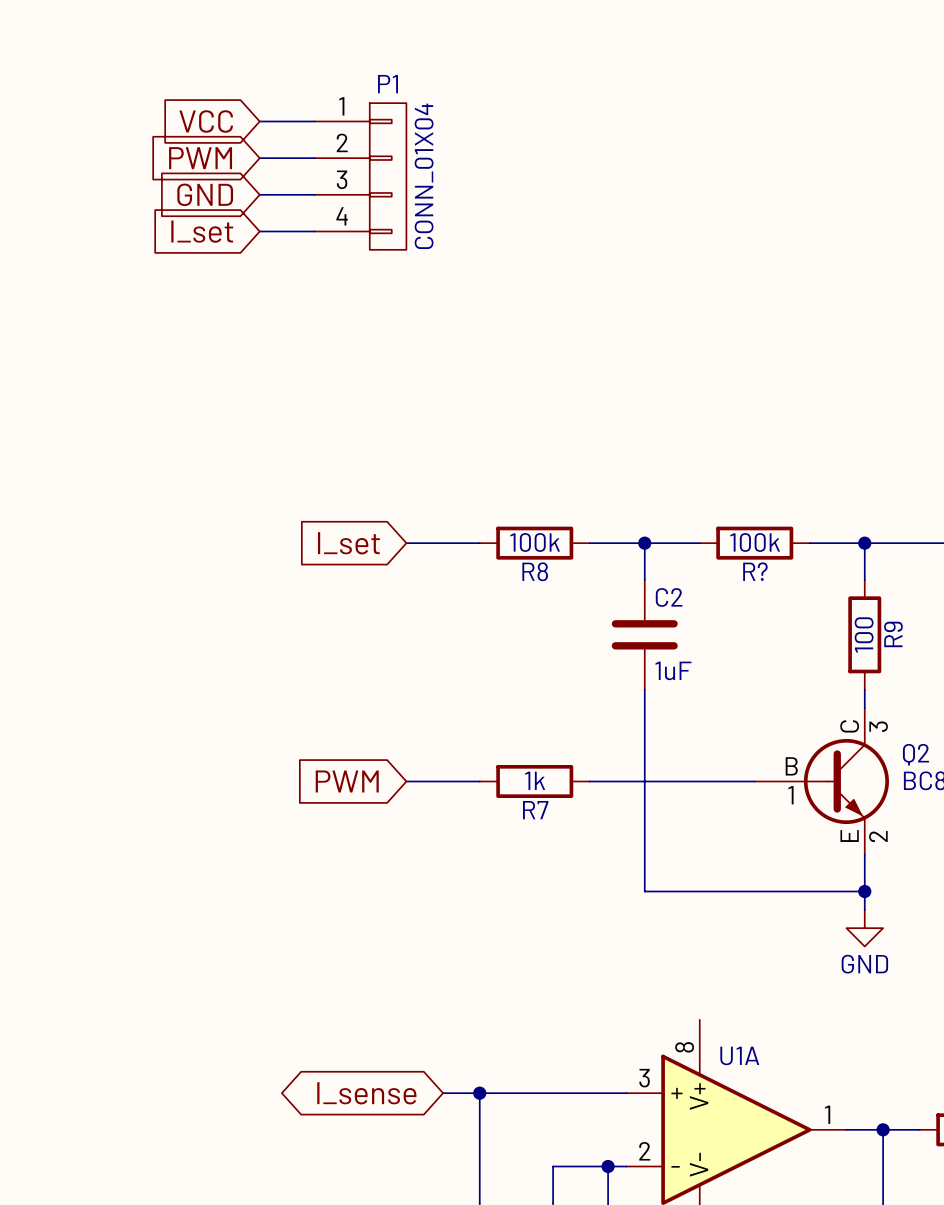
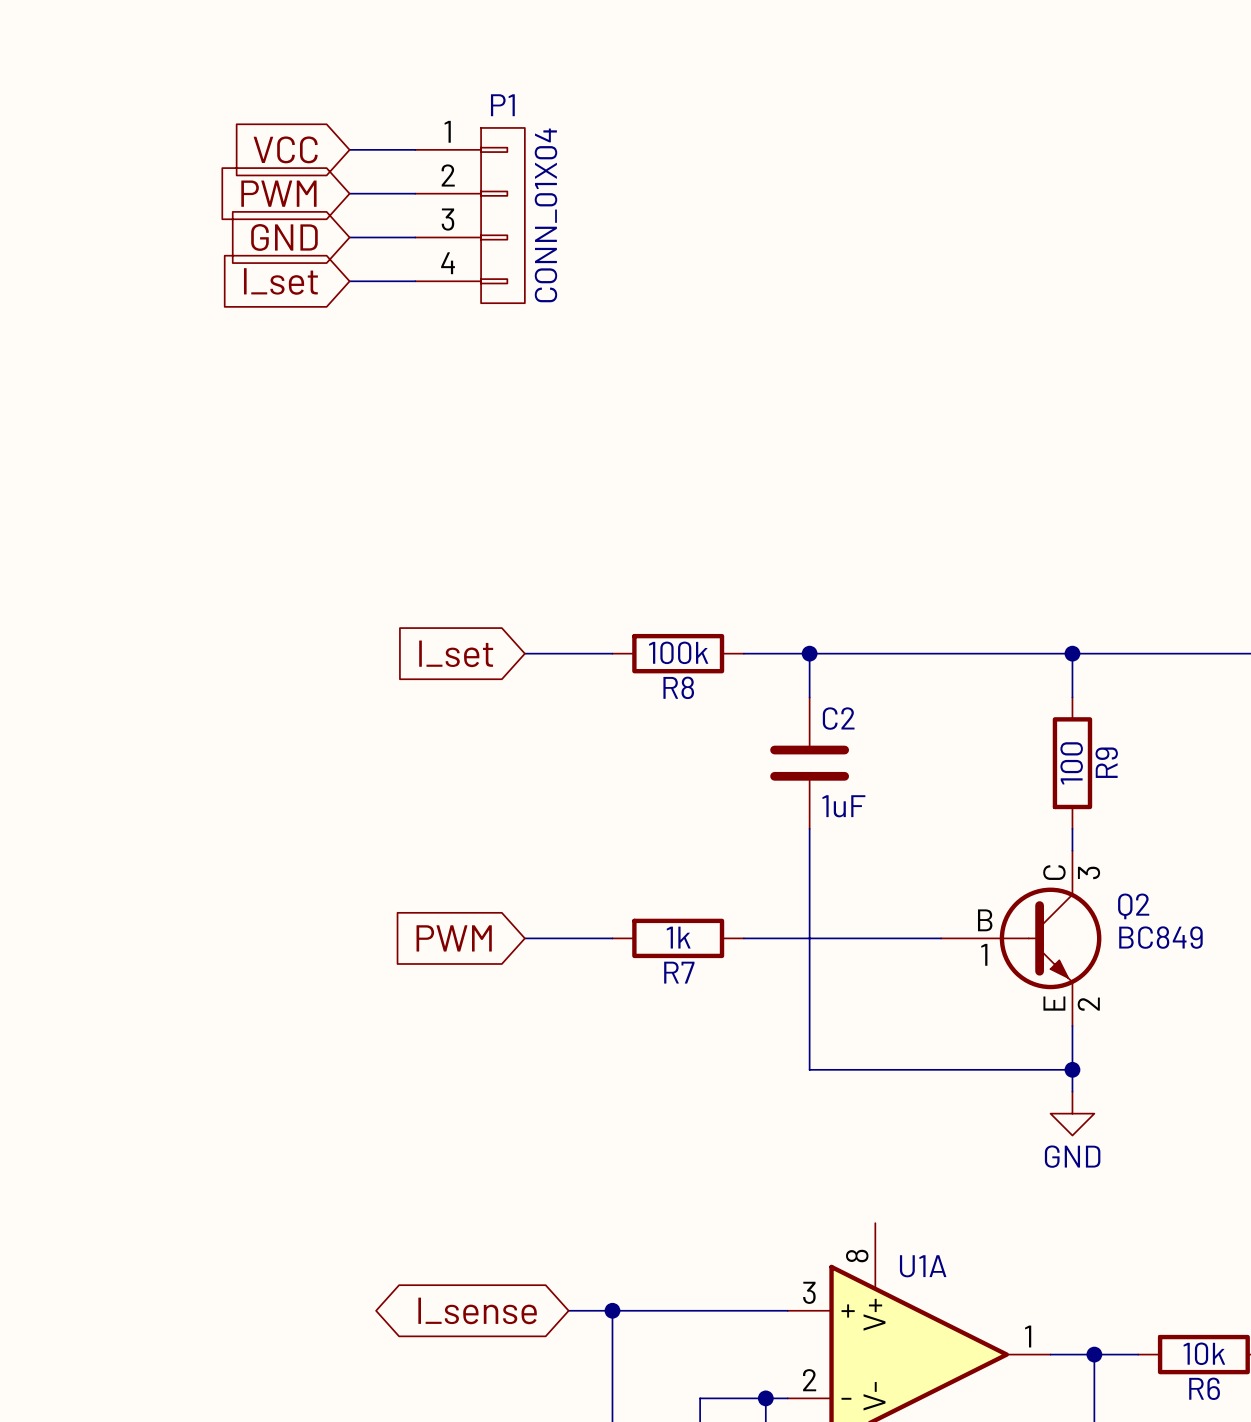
wire: none -> (875, 653) (1006, 653)
R?: 100k (754, 543) -> none

